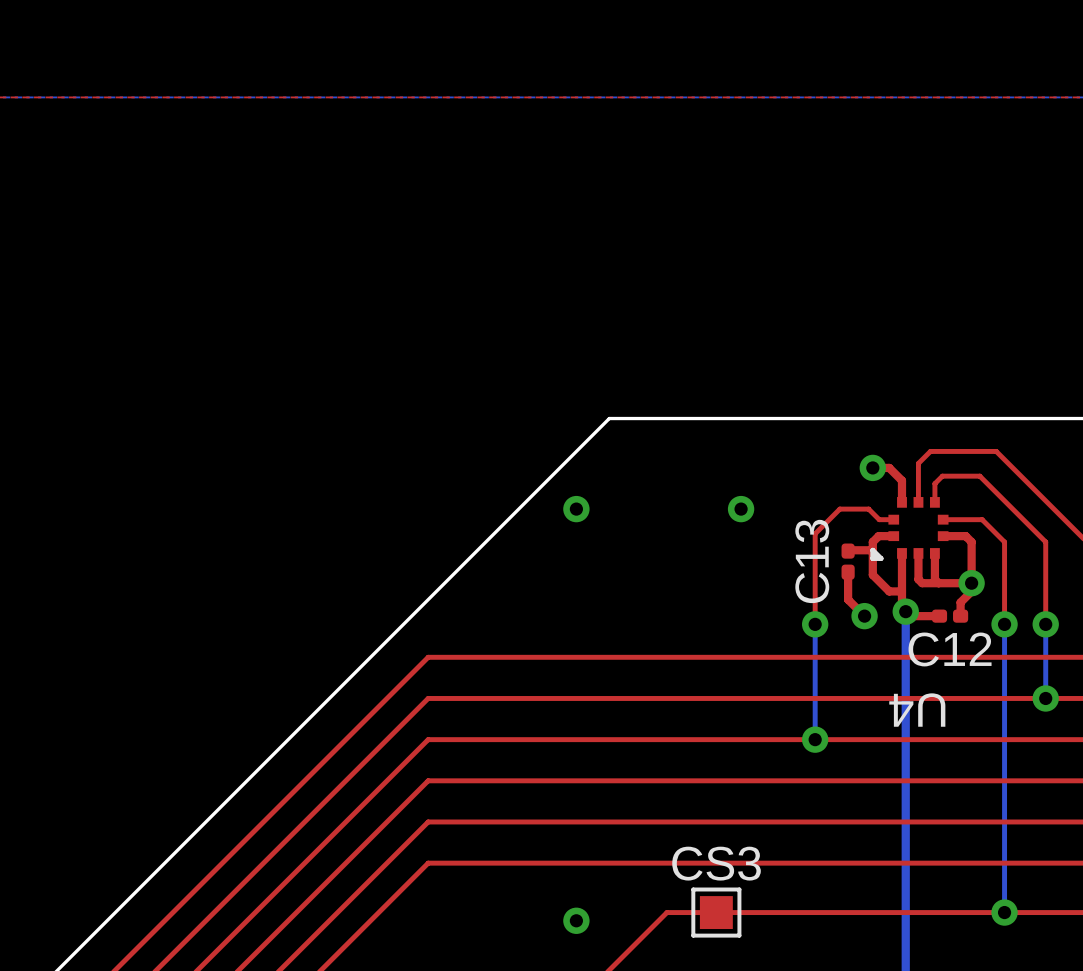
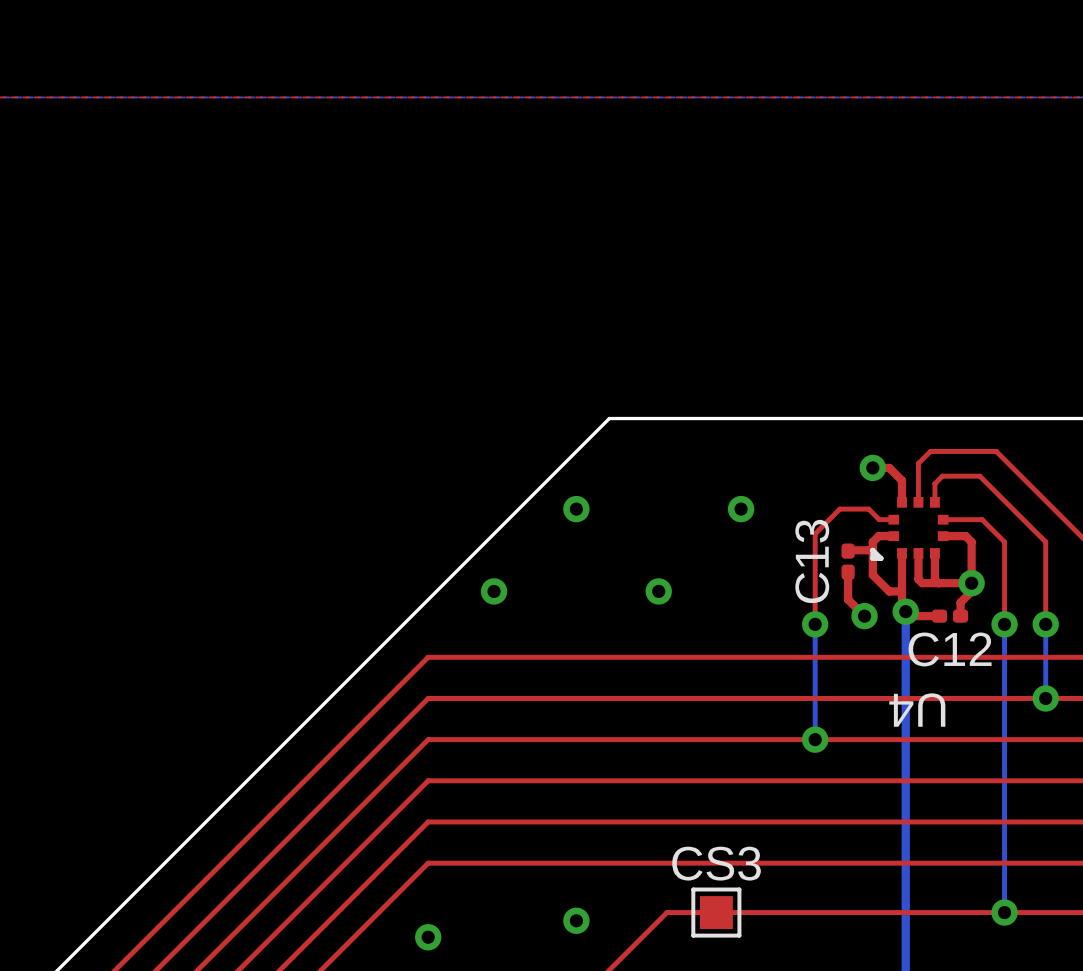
via: none -> (494, 591)
via: none -> (658, 591)
via: none -> (428, 937)

